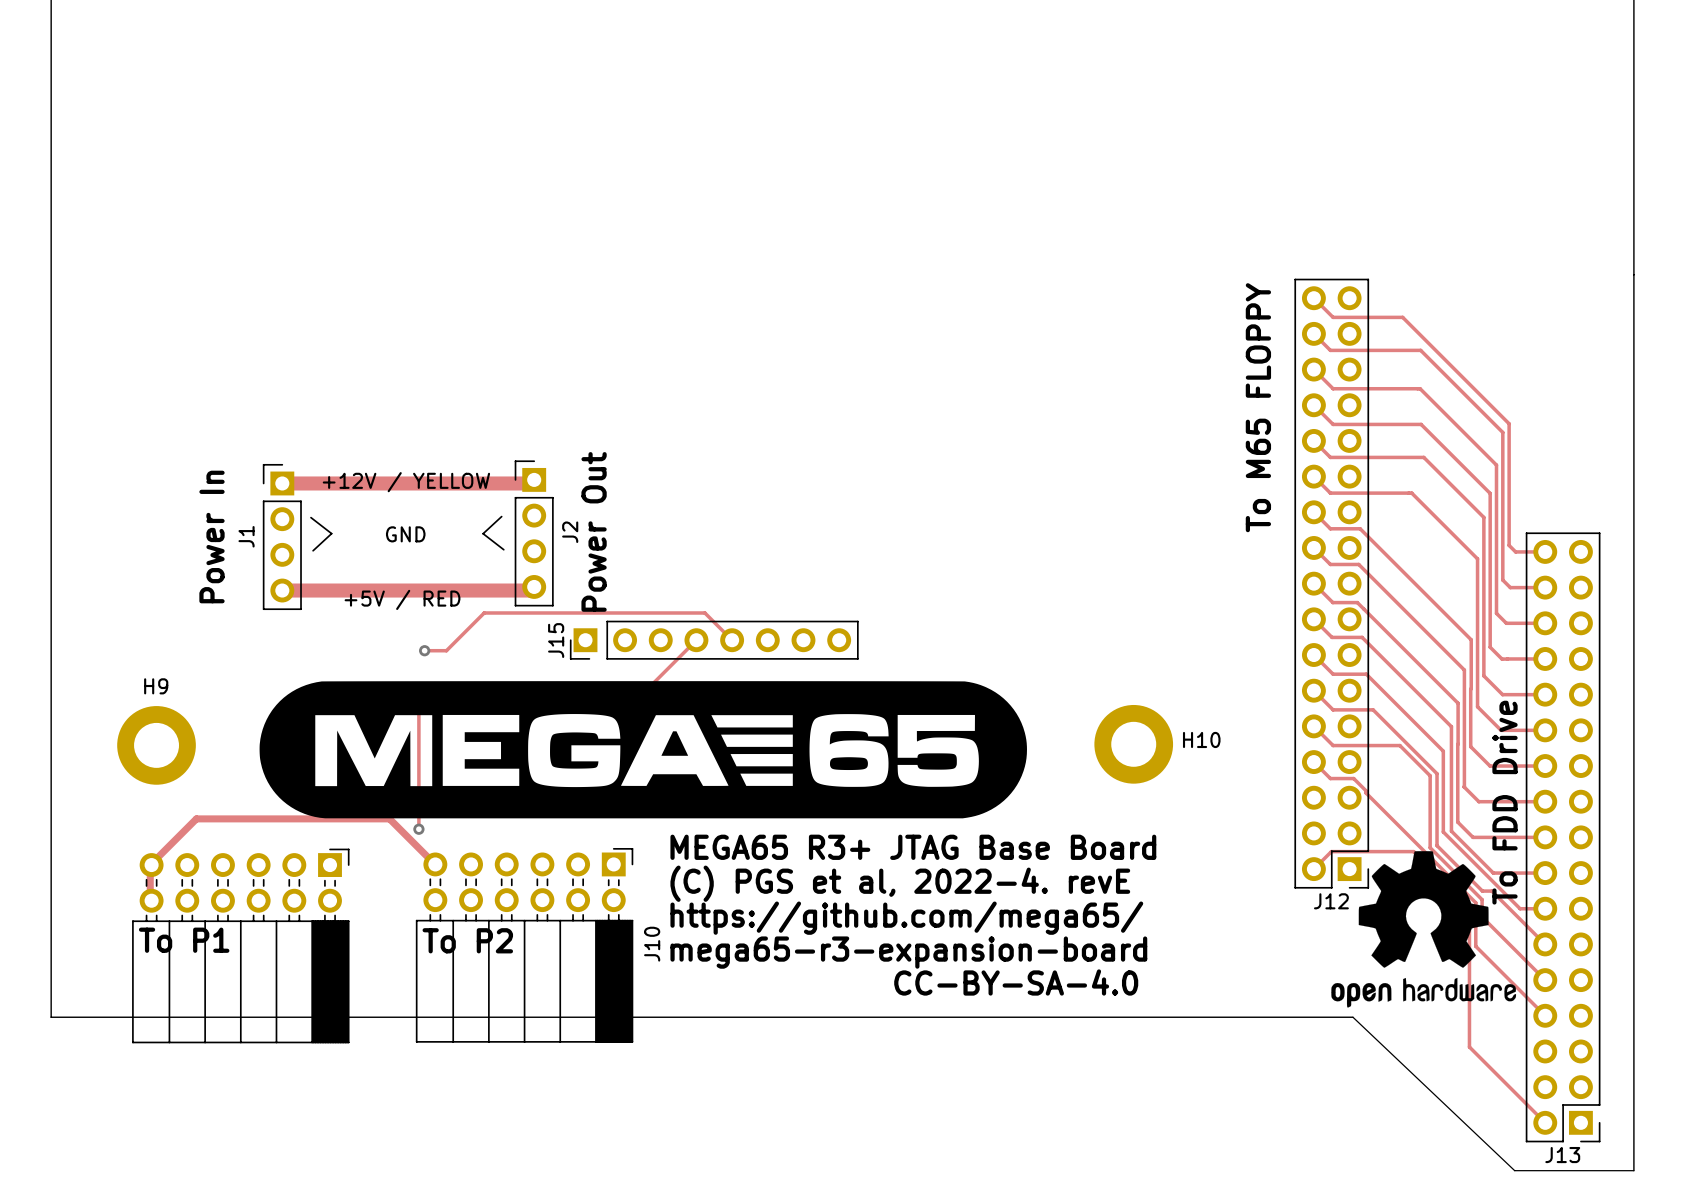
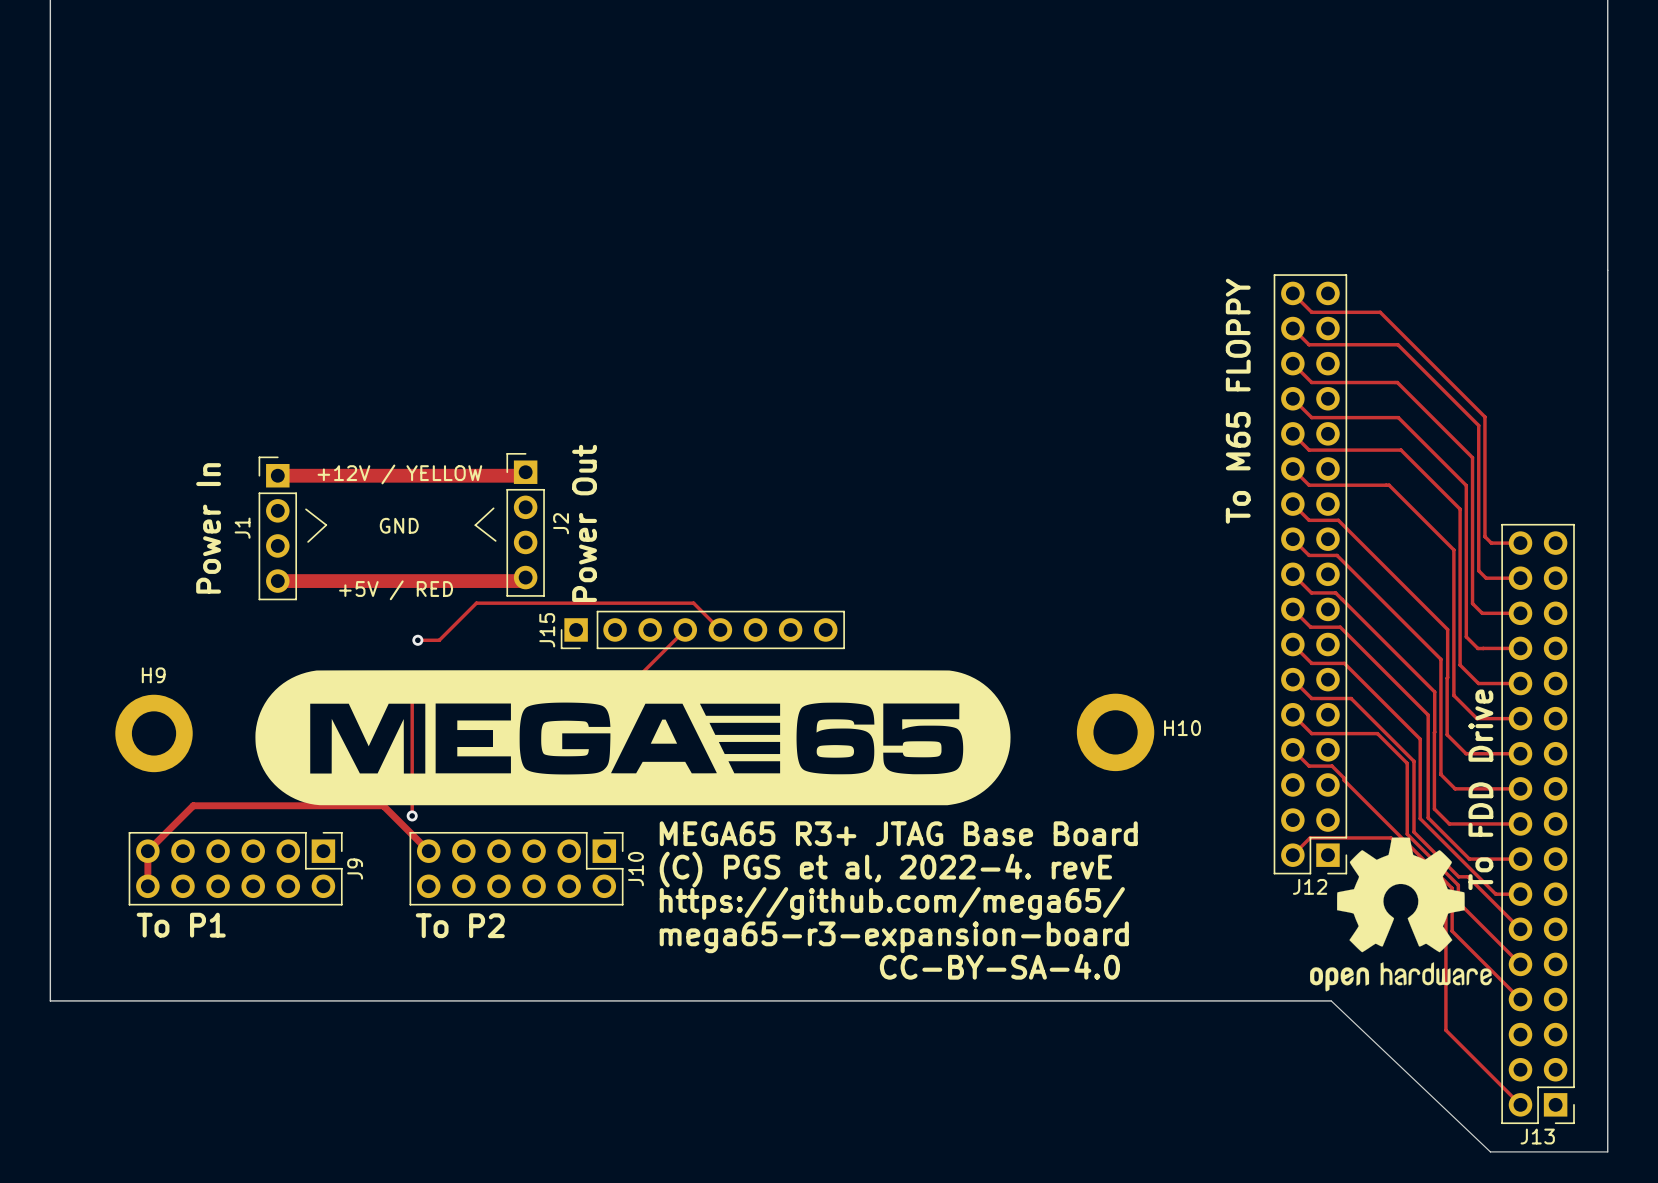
J10 footprint: [415, 848, 634, 1043] -> [409, 831, 624, 906]
J9: none -> (235, 868)
part: (240, 945) -> none

